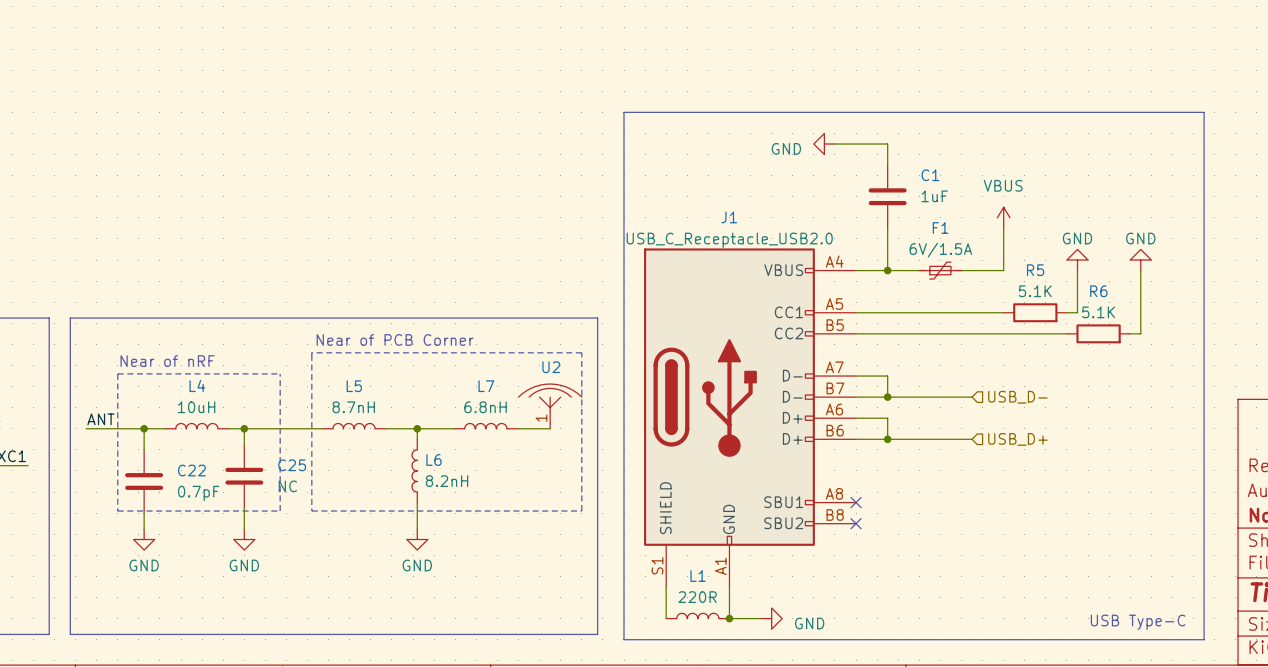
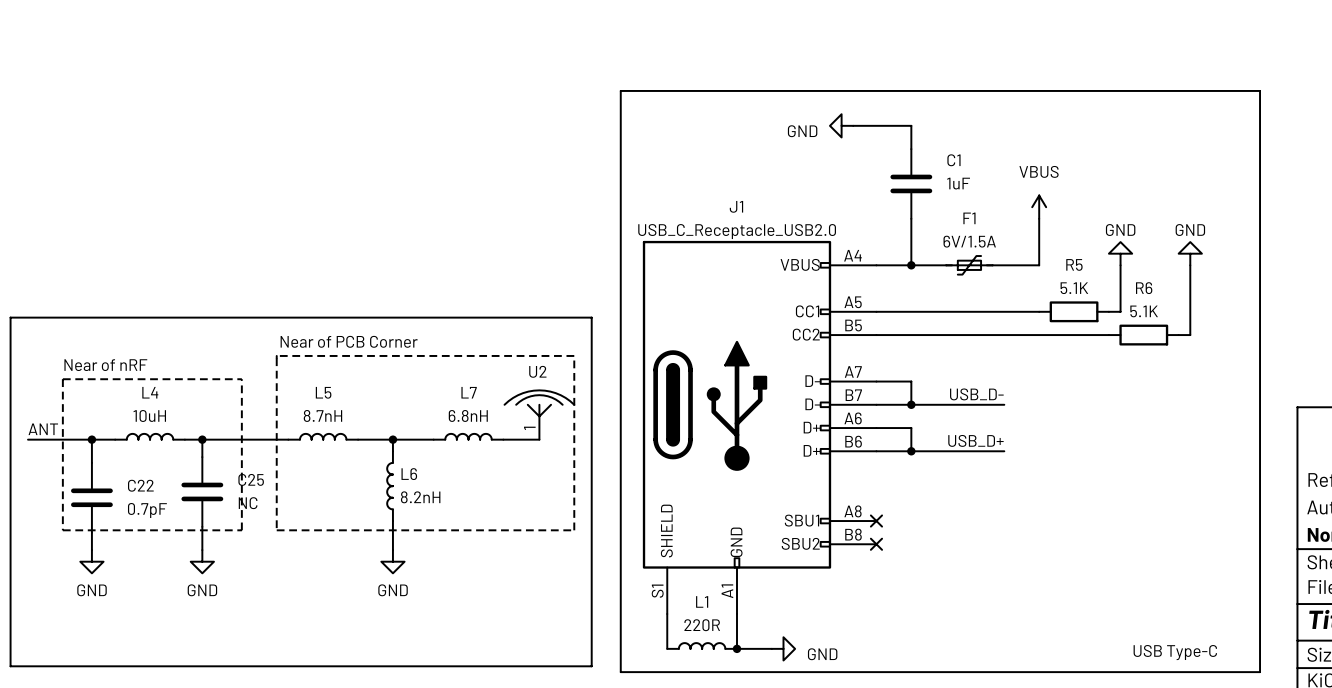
label: none -> USB_D- (976, 394)
hierarchical label: USB_D- (1017, 397) -> none
label: none -> USB_D+ (975, 440)
hierarchical label: USB_D+ (1017, 439) -> none

